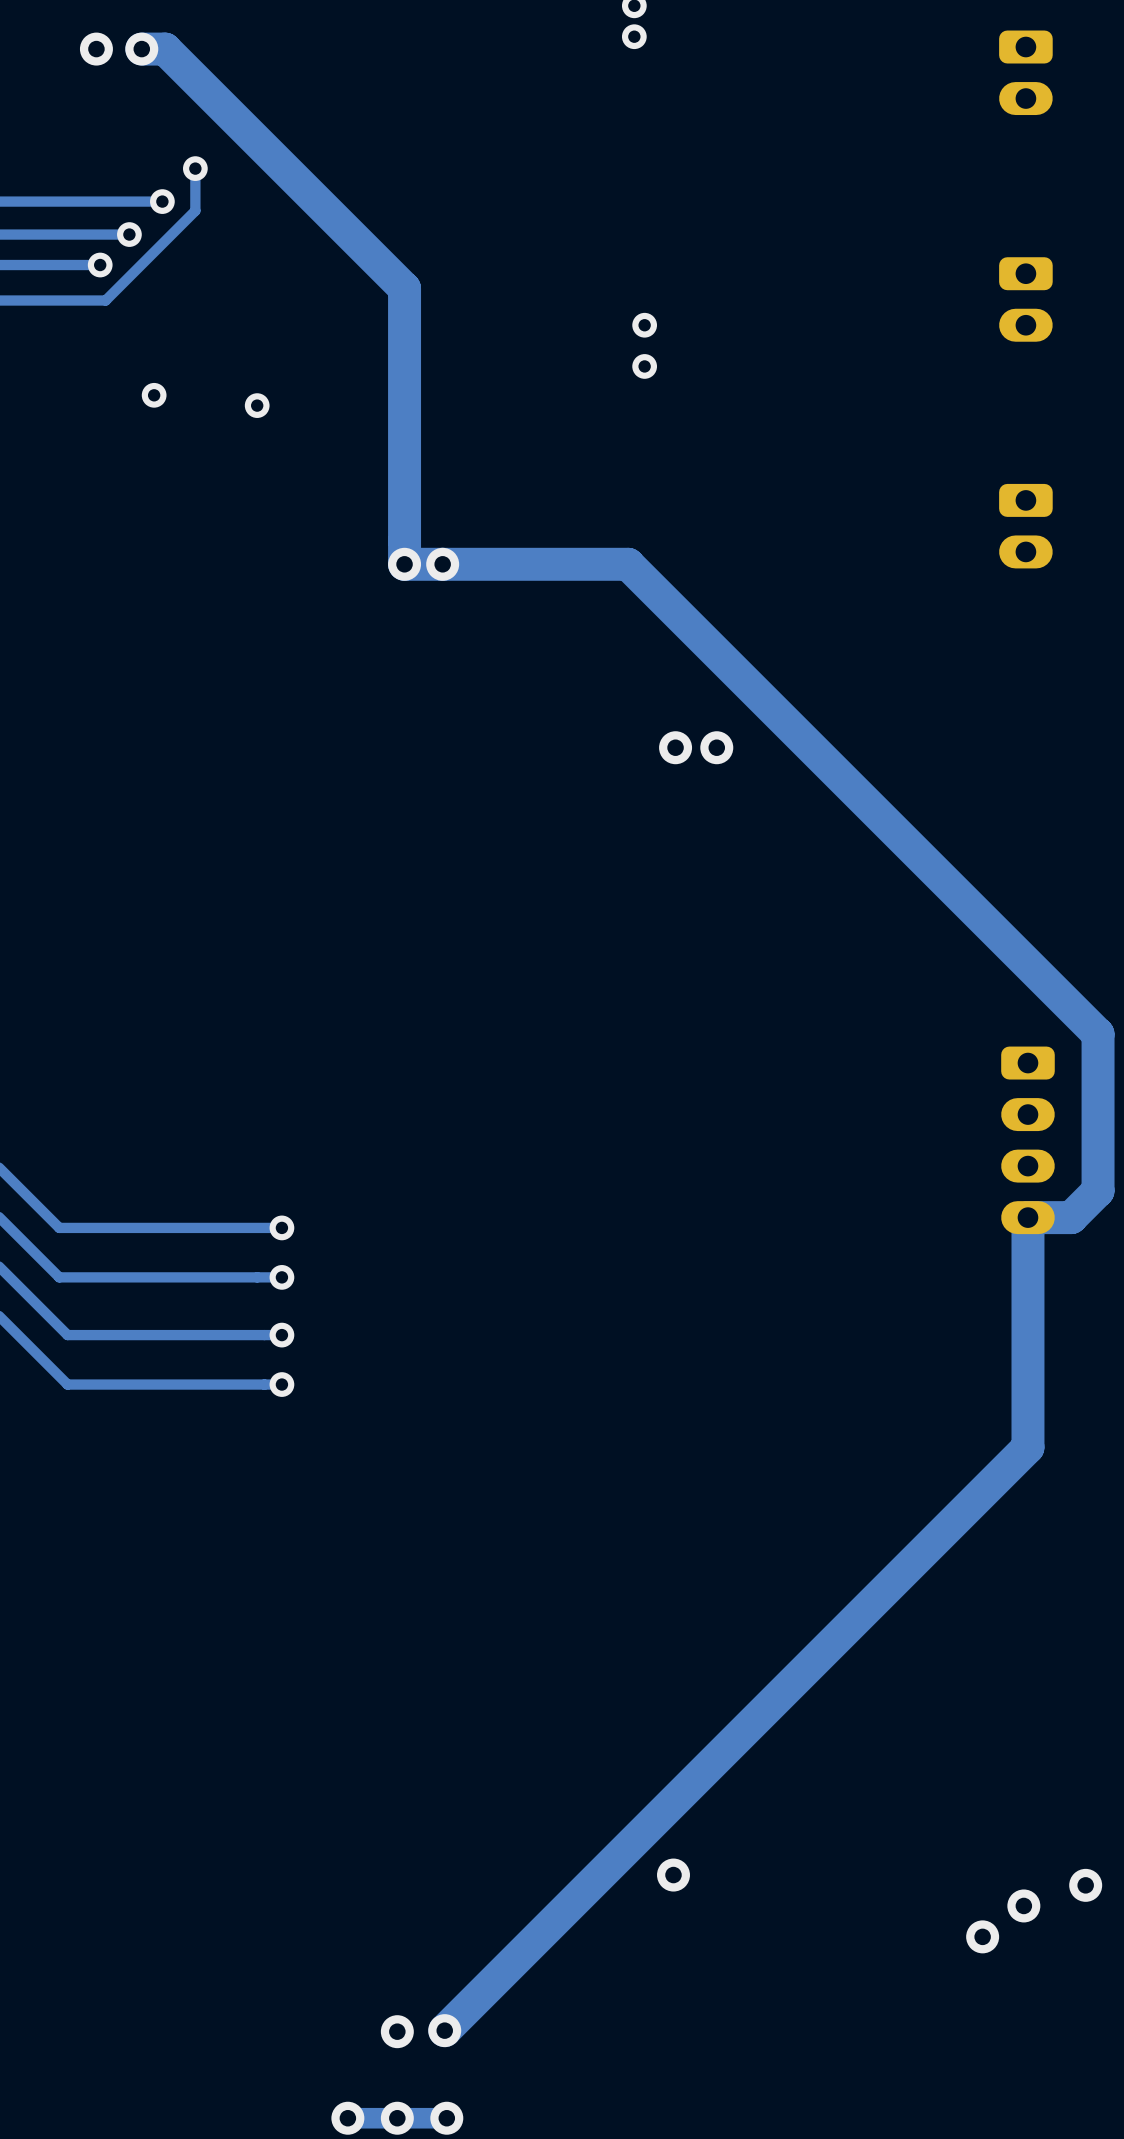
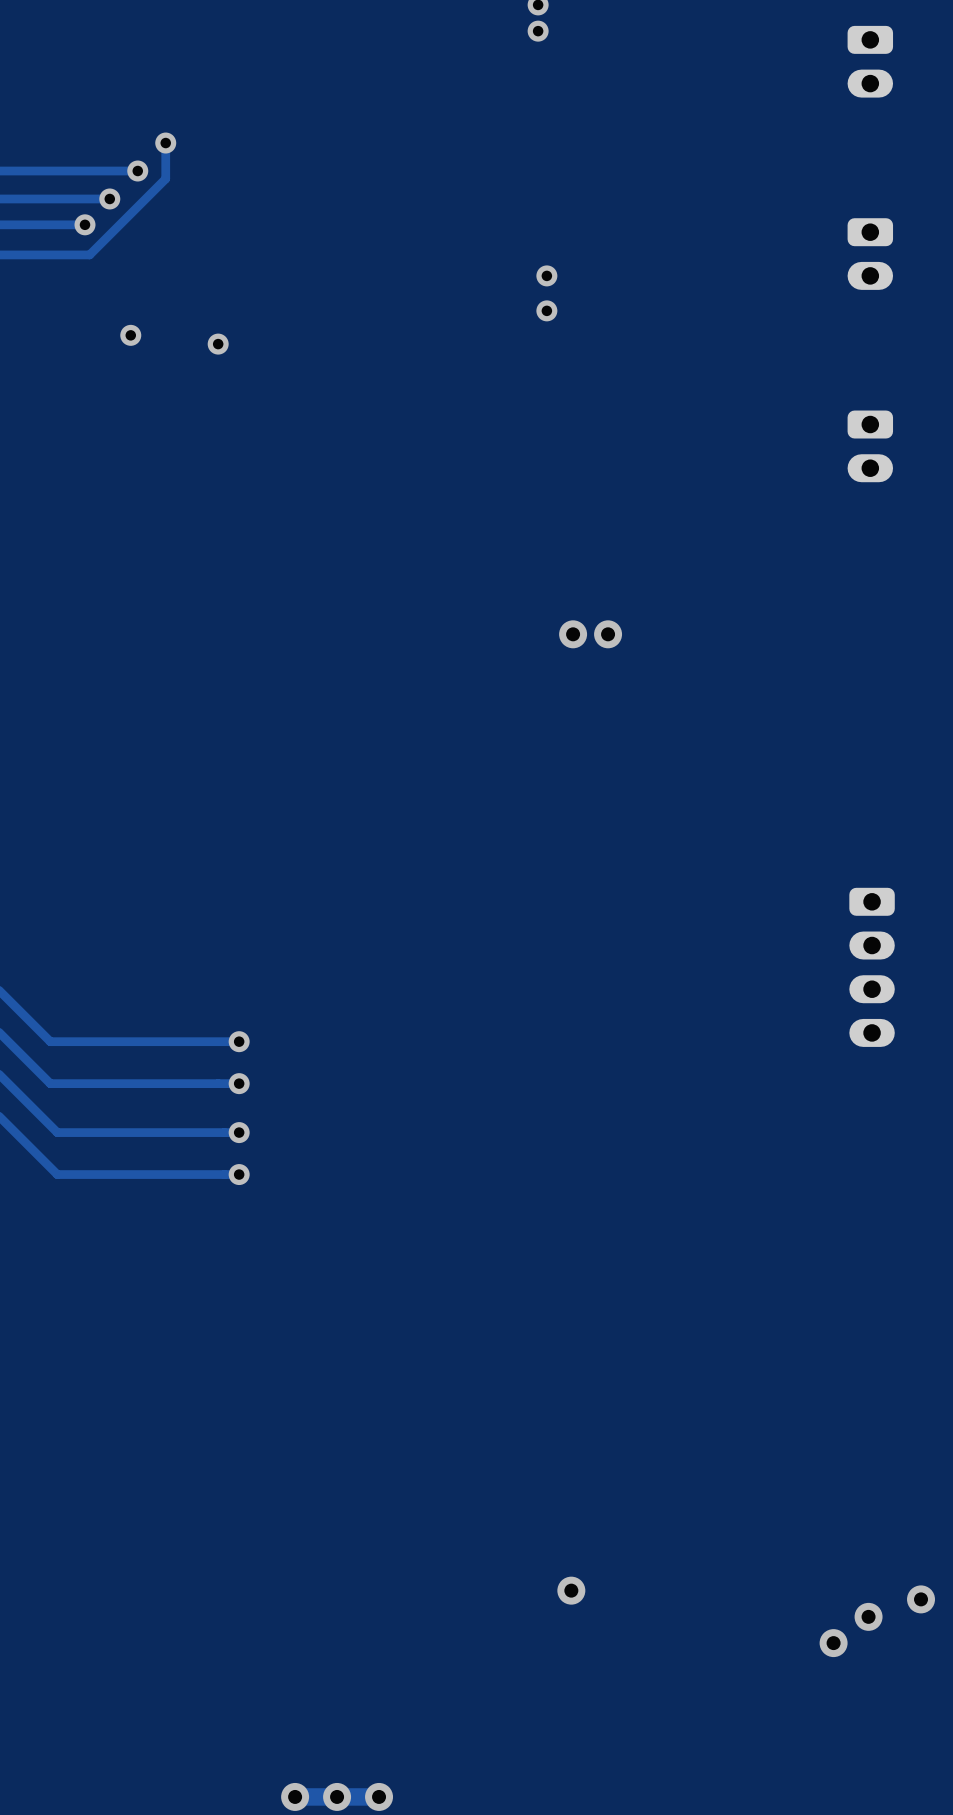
via: (96, 49) -> none
track: (141, 49) (165, 49) (404, 288) (404, 564) (628, 564) (1098, 1034) (1098, 1190) (1071, 1217) (1027, 1217) (1027, 1447) (444, 2030) -> none
via: (141, 49) -> none
via: (404, 564) -> none
via: (442, 564) -> none
via: (444, 2030) -> none
via: (397, 2031) -> none

